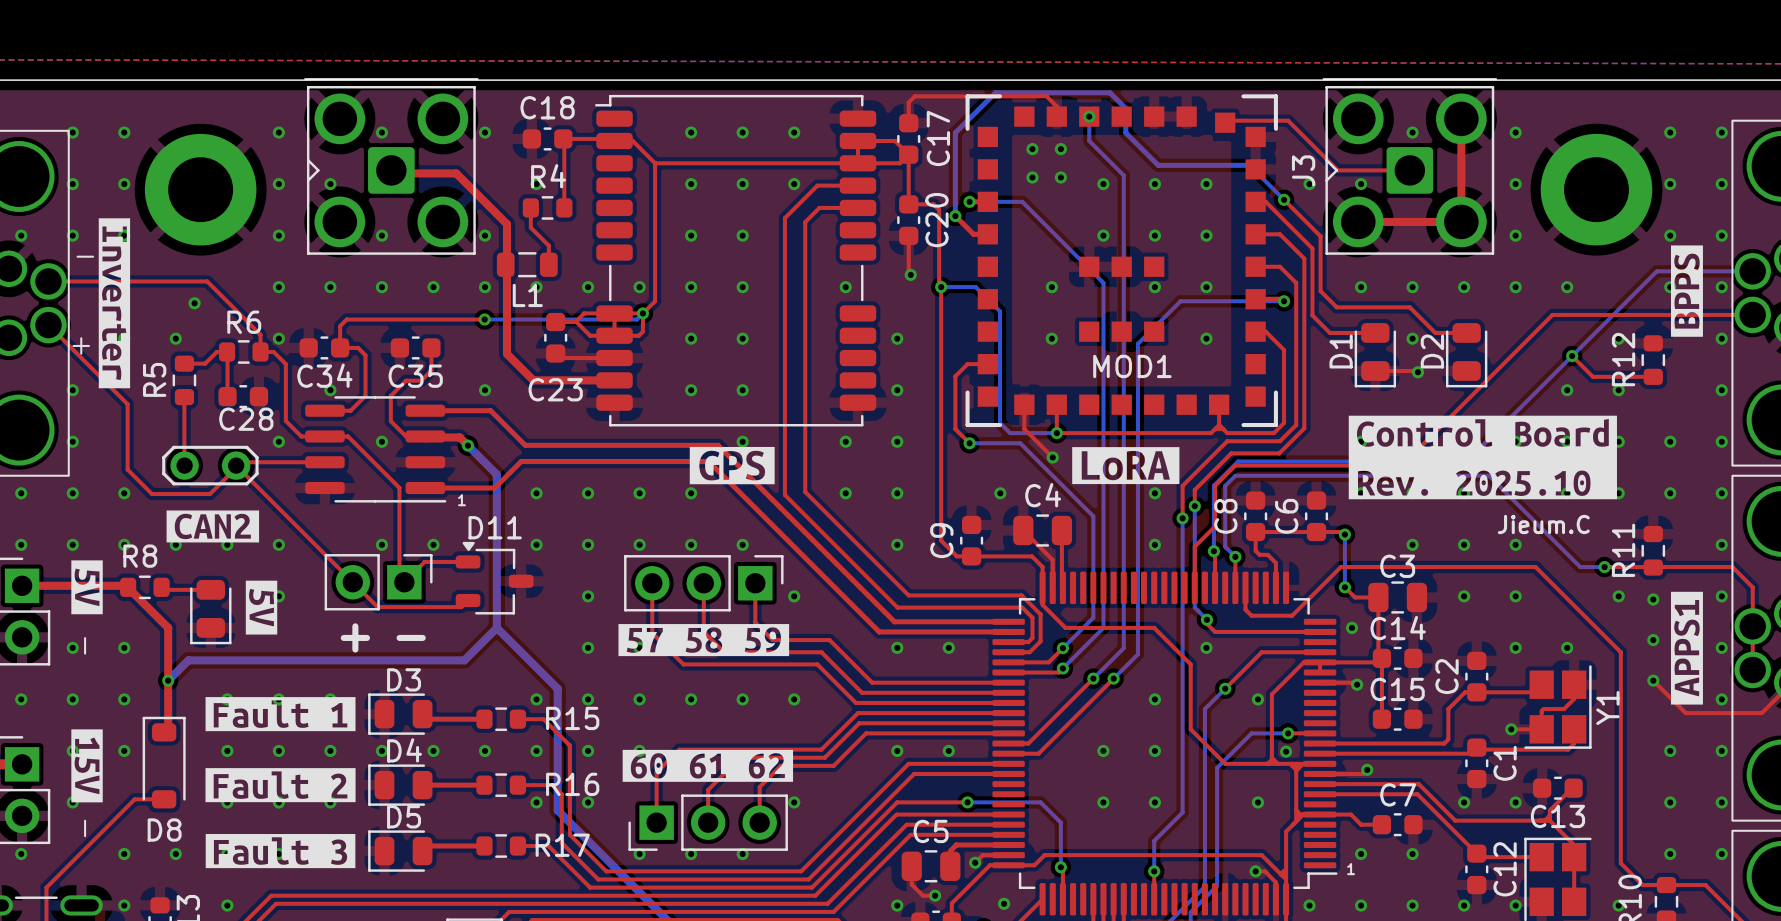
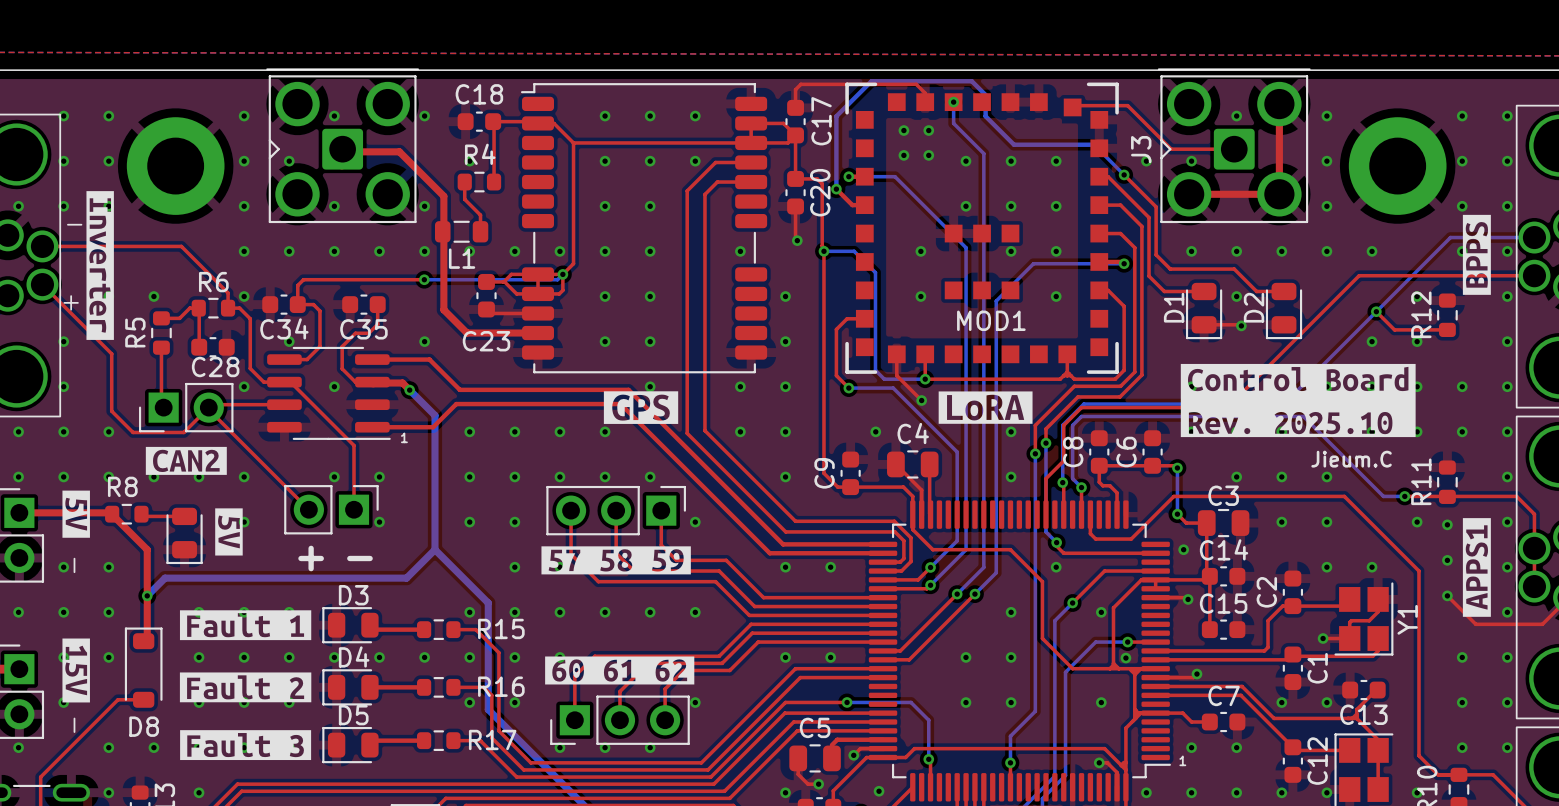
via: (194, 303) -> none
top track: (331, 436) (348, 436) (399, 487) (399, 577) (404, 582) (424, 561) (468, 561) -> (290, 382) (353, 445) (353, 509)
part footprint: [162, 445, 259, 486] -> [138, 382, 234, 433]
D11: (494, 578) -> none
top track: (352, 582) (377, 607) (461, 607) (468, 600) -> none
via: none -> (379, 522)
via: none -> (469, 522)

